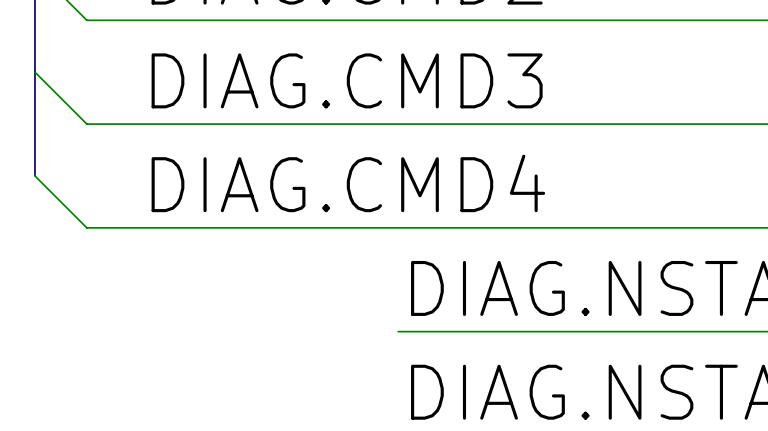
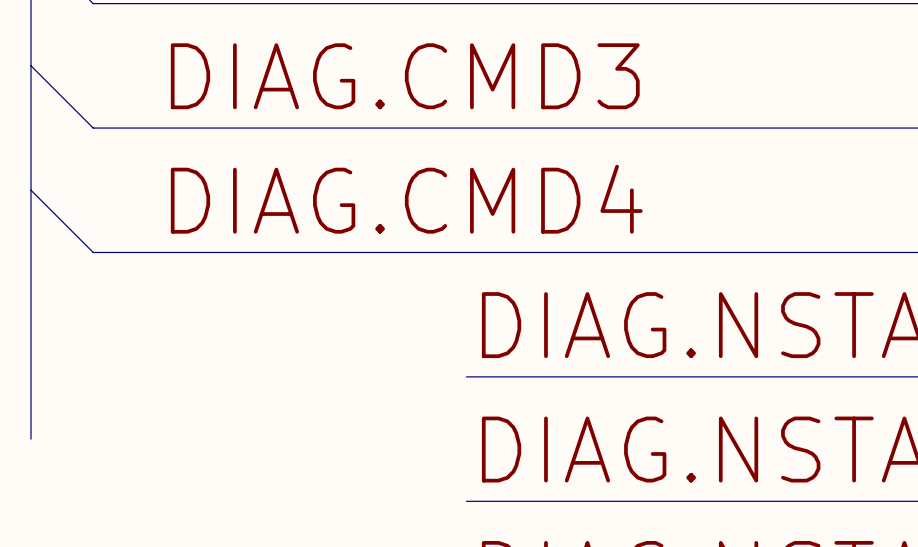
bus: none -> (31, 190) (31, 439)

